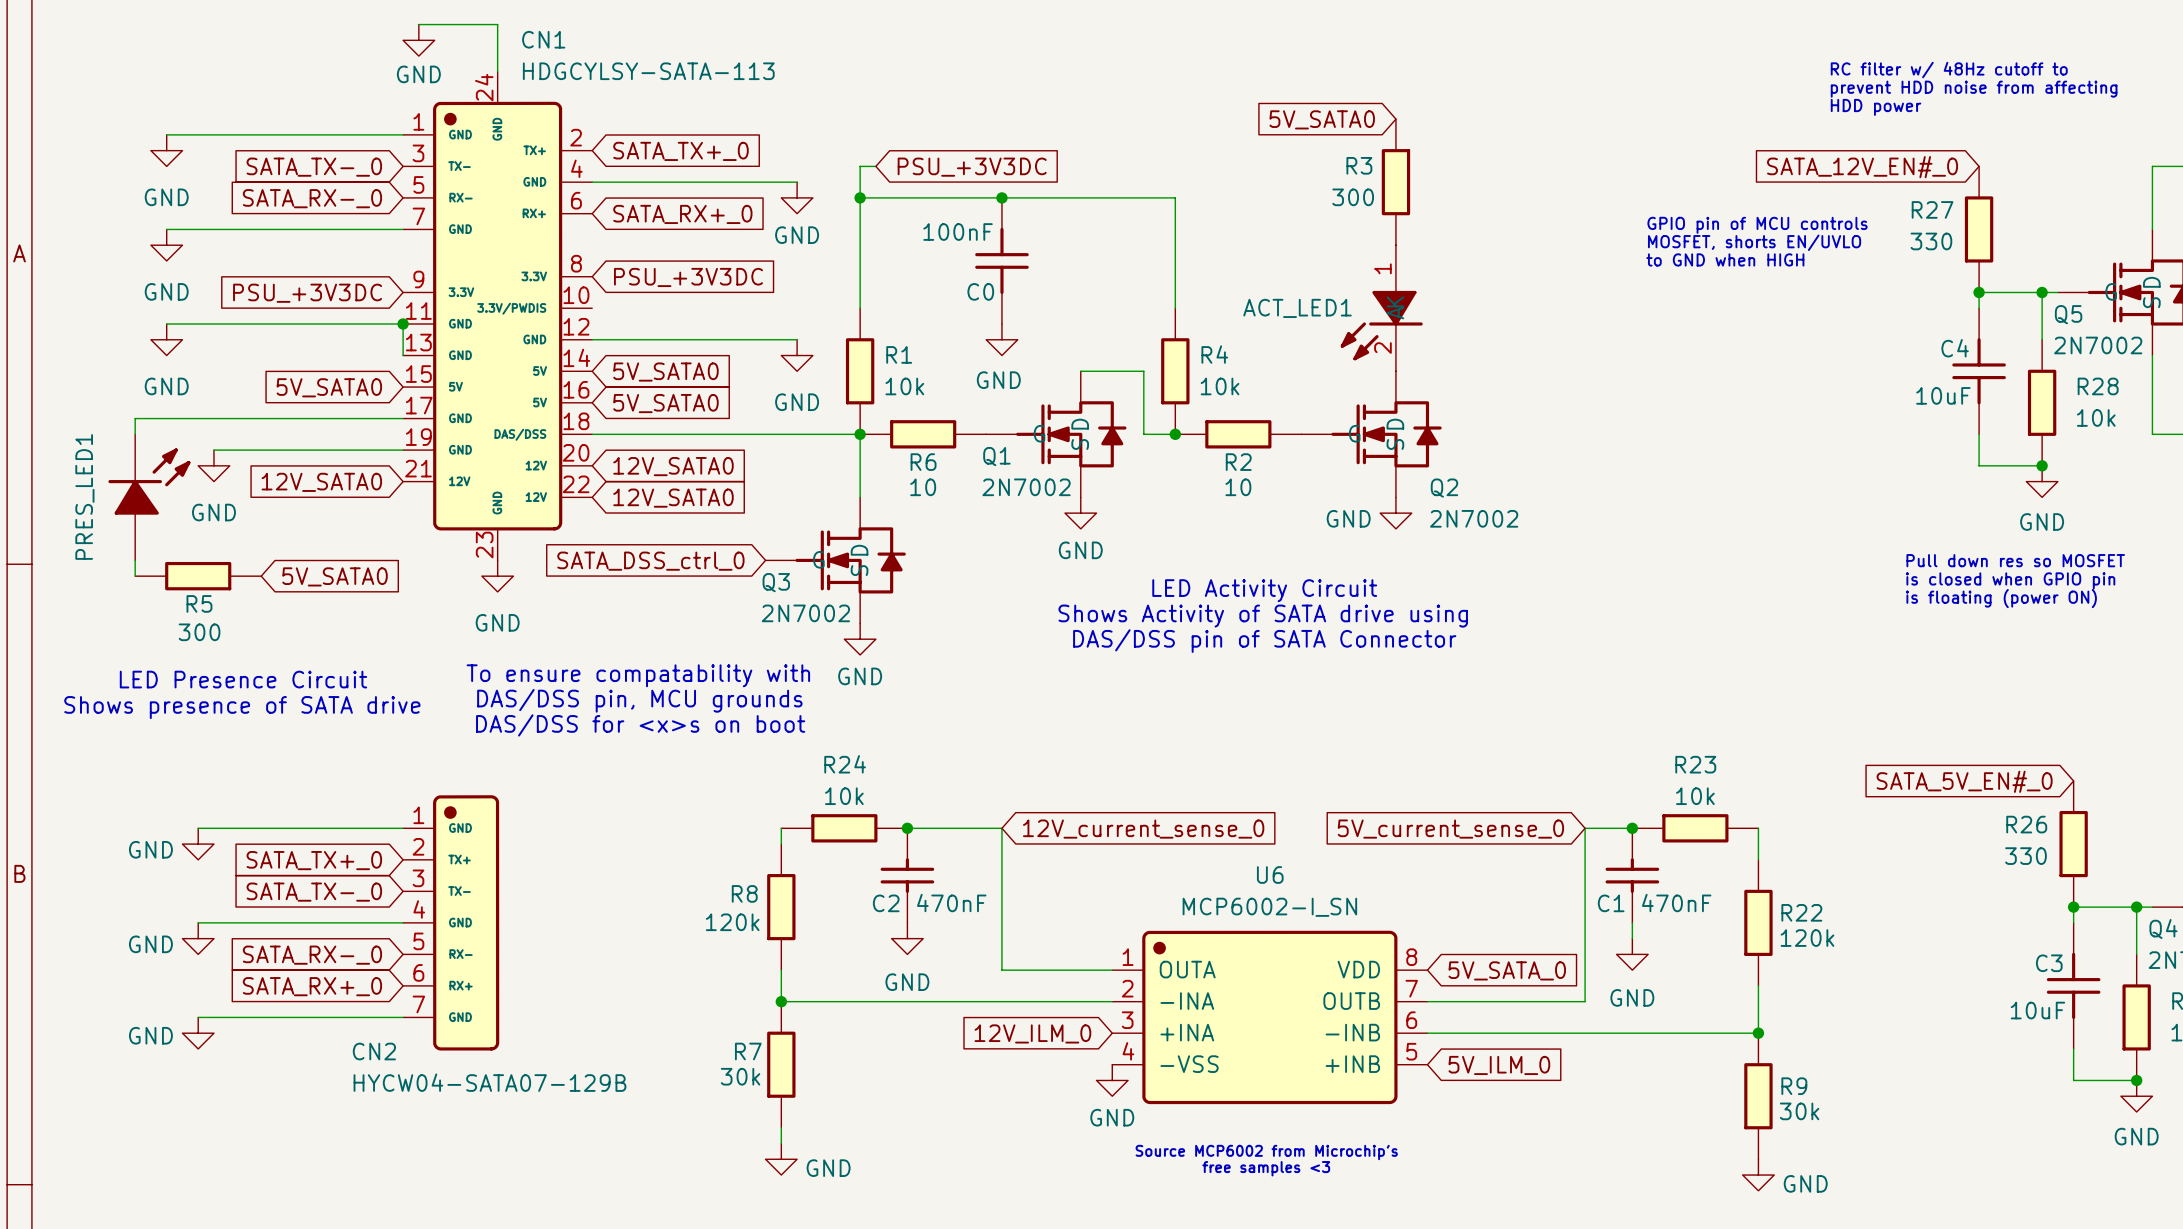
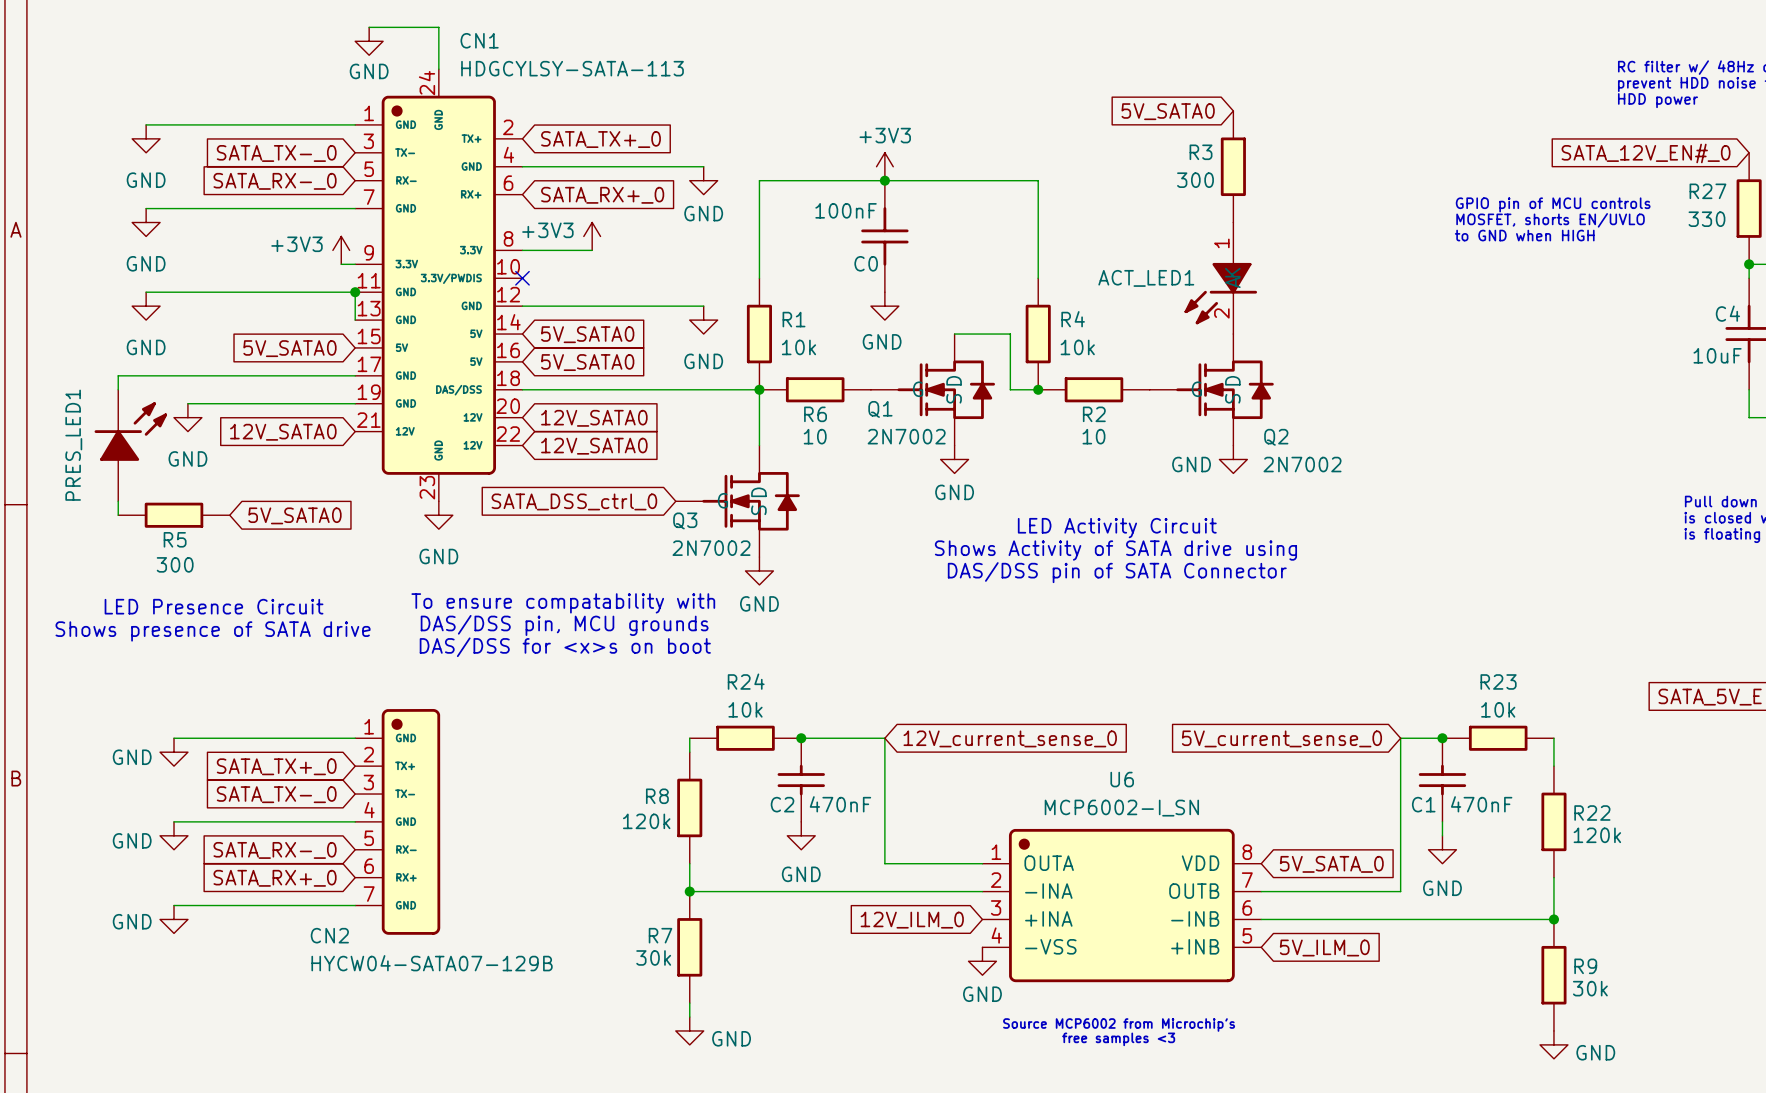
wire: (875, 166) (860, 166) (860, 197) -> none
global label: PSU_+3V3DC (972, 167) -> none
power symbol: none -> +3V3 (884, 166)
junction: (860, 197) -> none
power symbol: none -> +3V3 (592, 236)
power symbol: none -> +3V3 (341, 250)
wire: none -> (522, 250) (592, 250)
global label: PSU_+3V3DC (688, 277) -> none
wire: none -> (341, 264) (355, 264)
global label: PSU_+3V3DC (307, 293) -> none
no-connect mark: none -> (522, 278)

